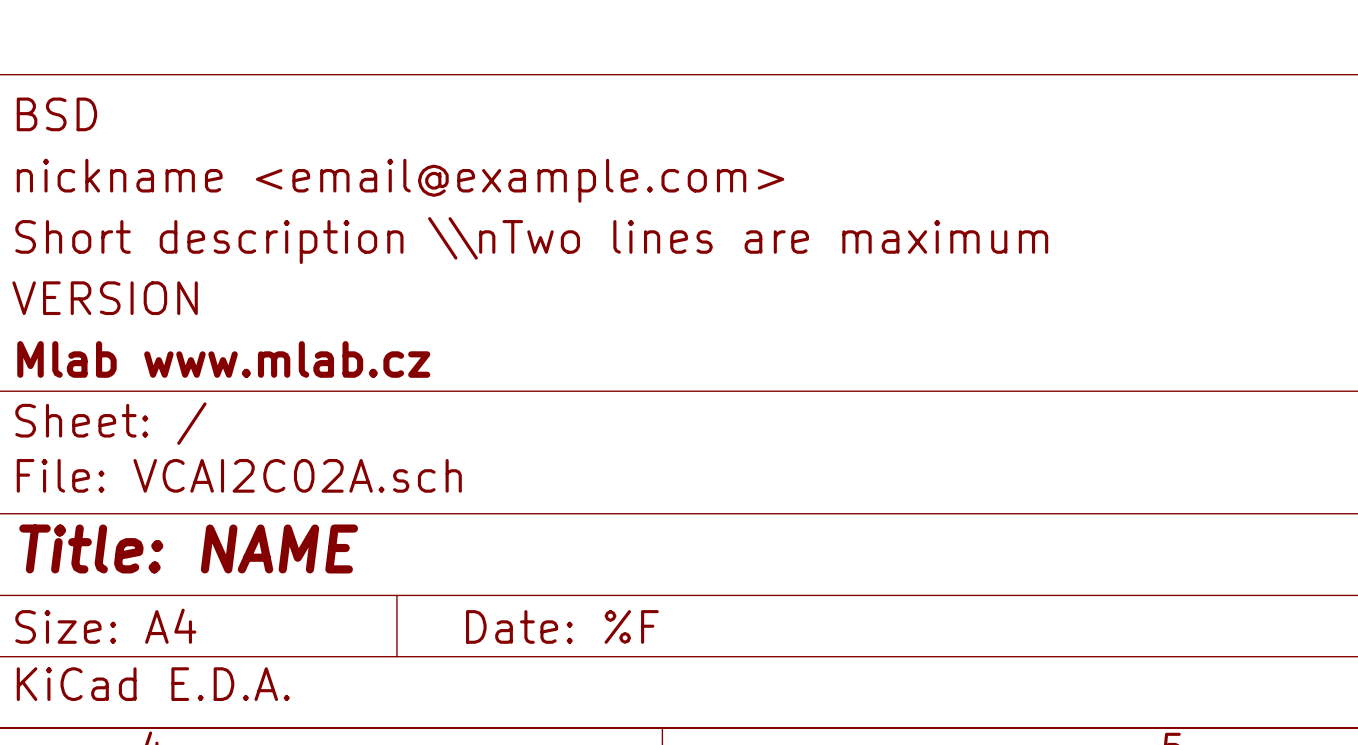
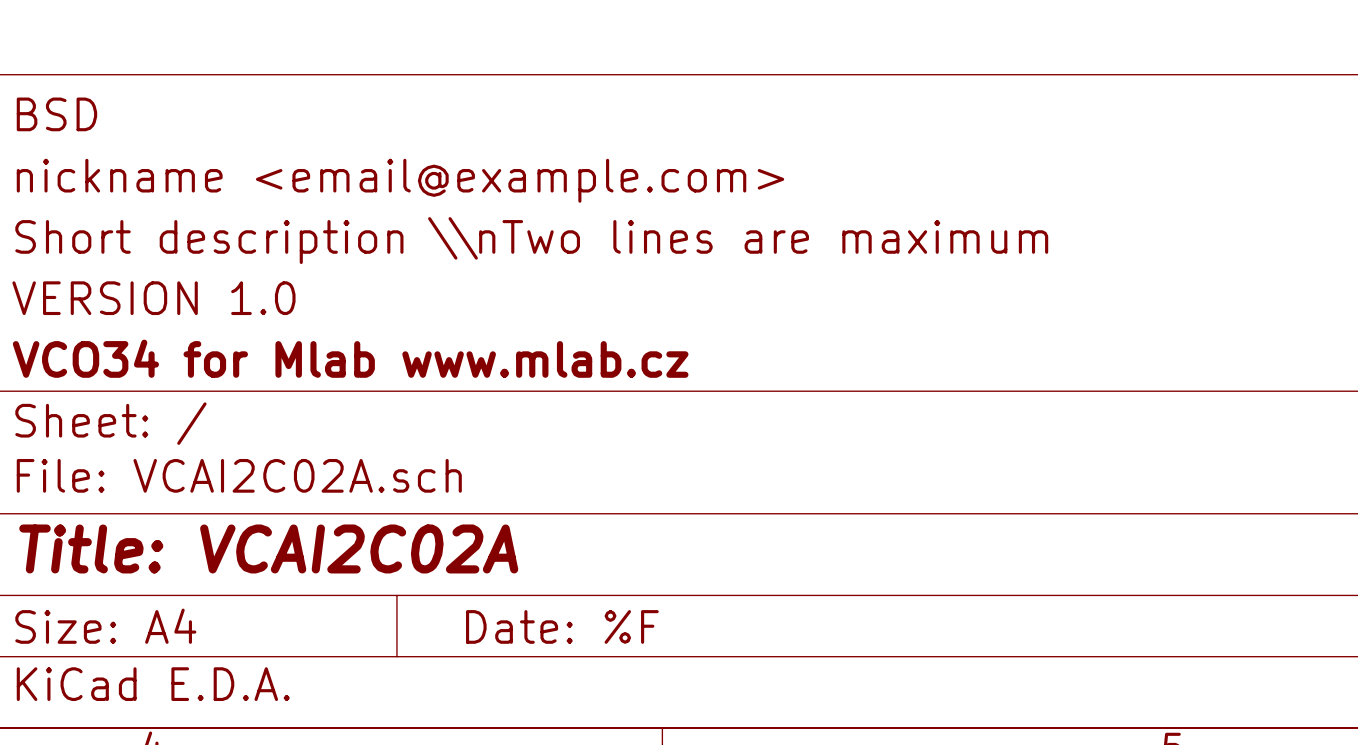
title block: VERSION (105, 298) -> VERSION 1.0 (153, 298)
title block: Mlab www.mlab.cz (223, 359) -> VCO34 for Mlab www.mlab.cz (350, 358)
title block: Title: NAME (188, 548) -> Title: VCAI2C02A (268, 548)

